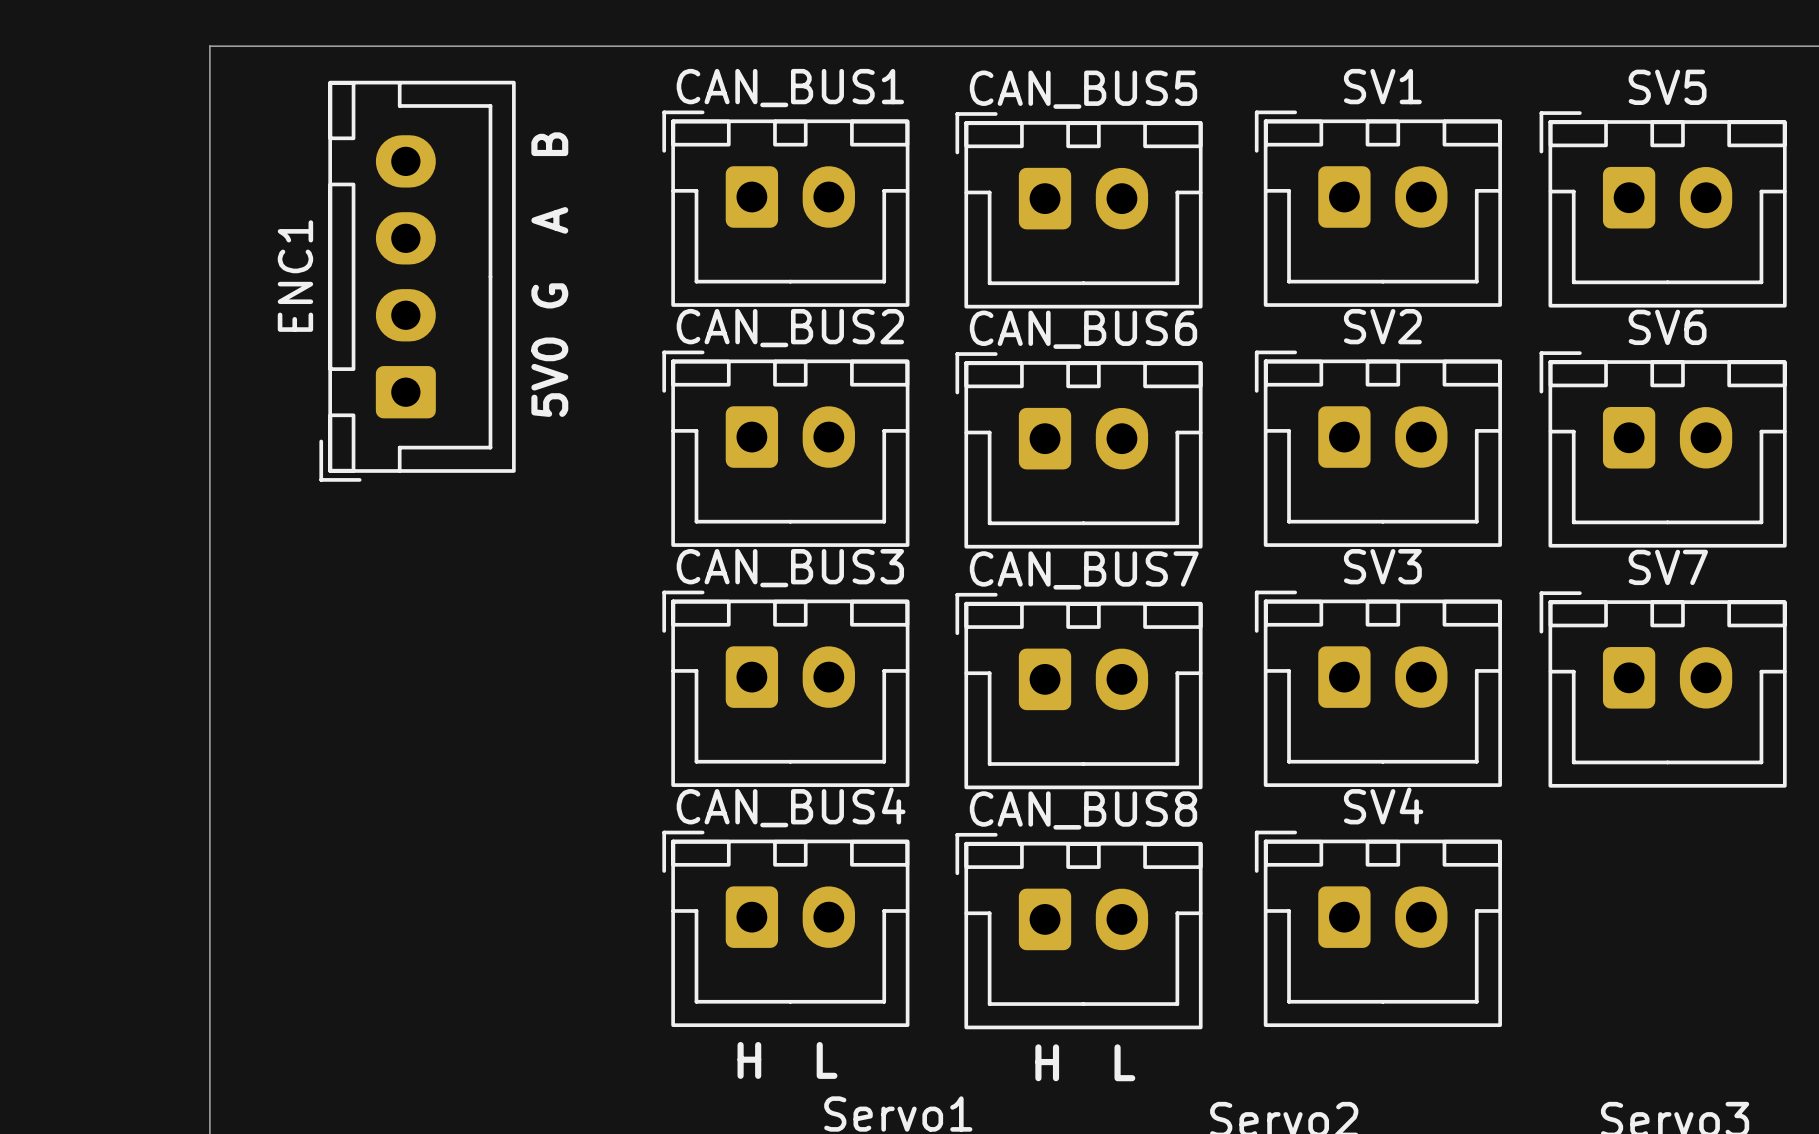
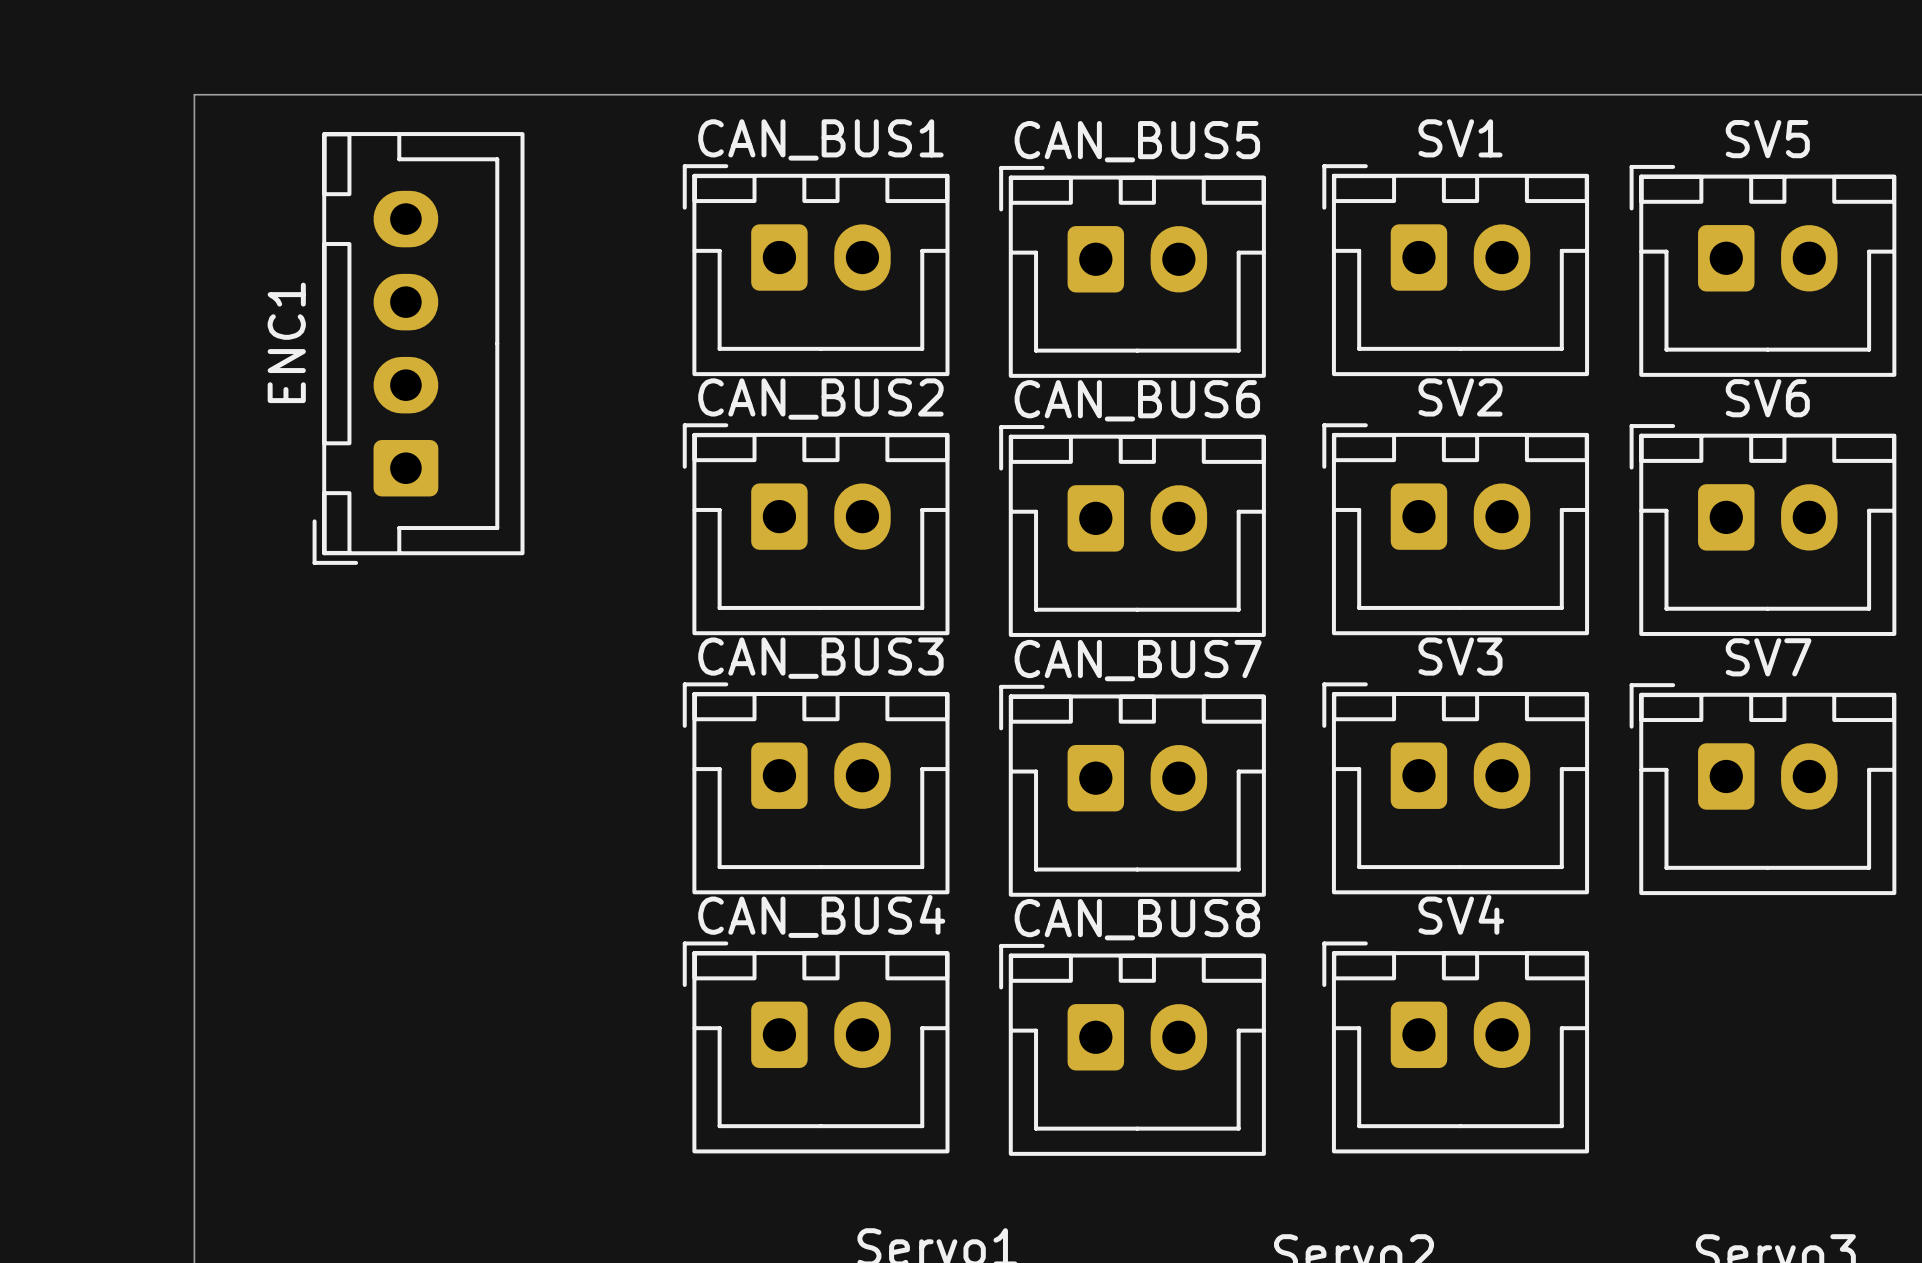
text: 5V0 G A B (549, 274) -> none
text: H L (787, 1060) -> none
text: H L (1085, 1062) -> none

